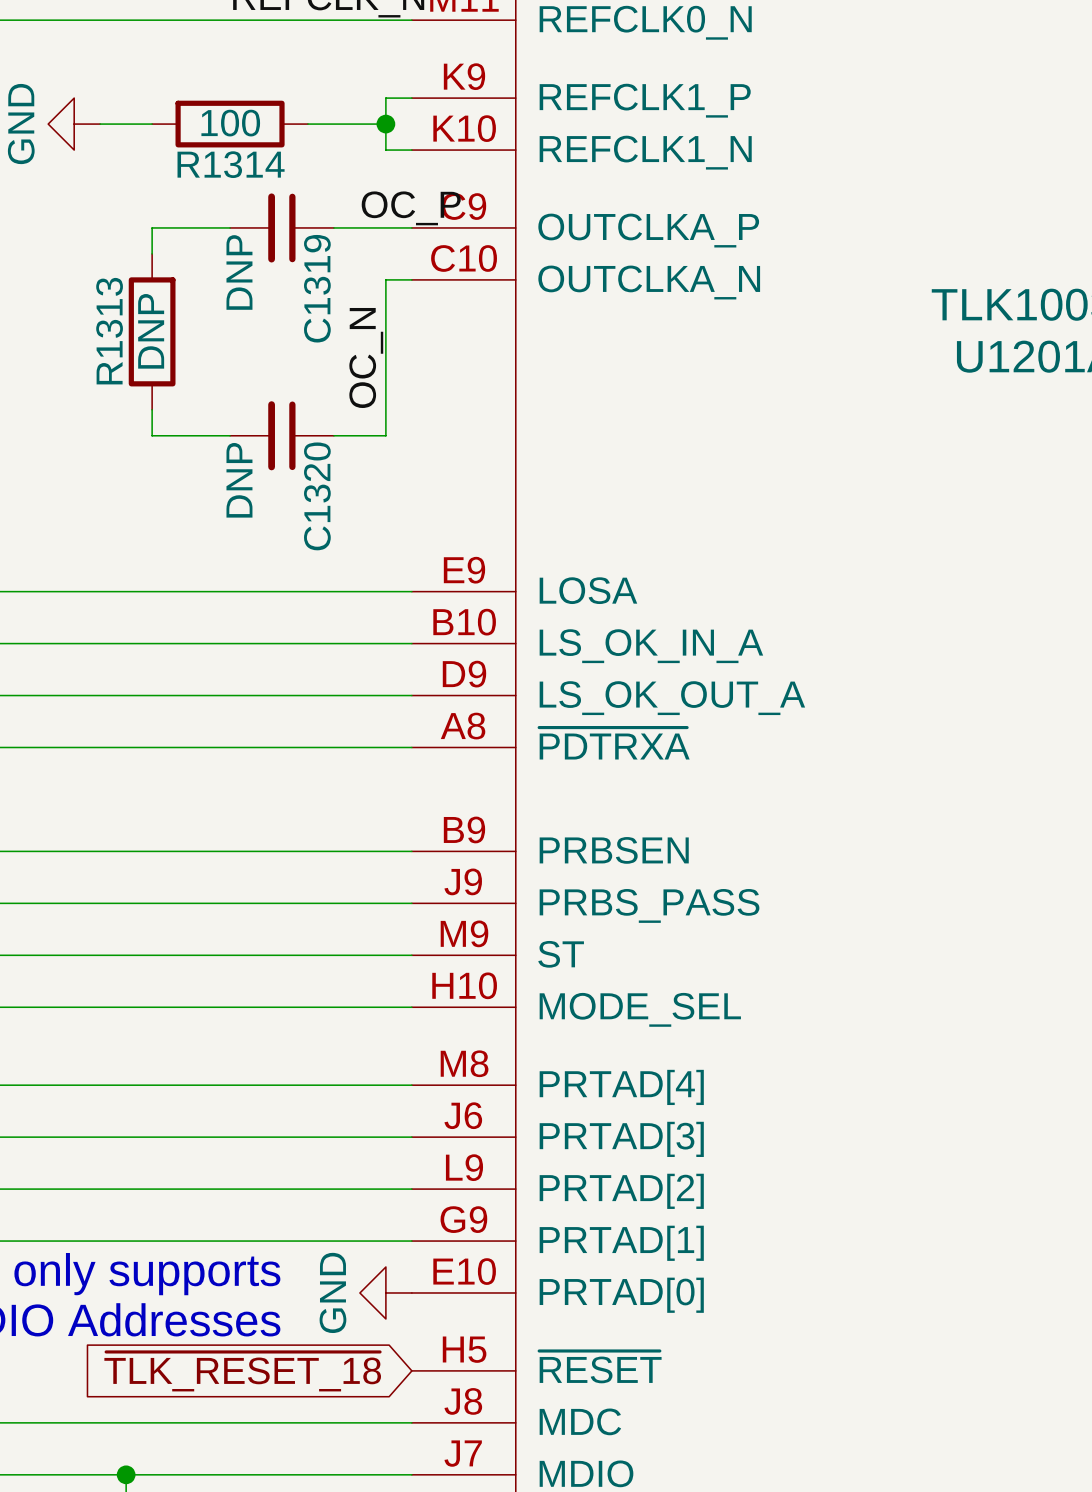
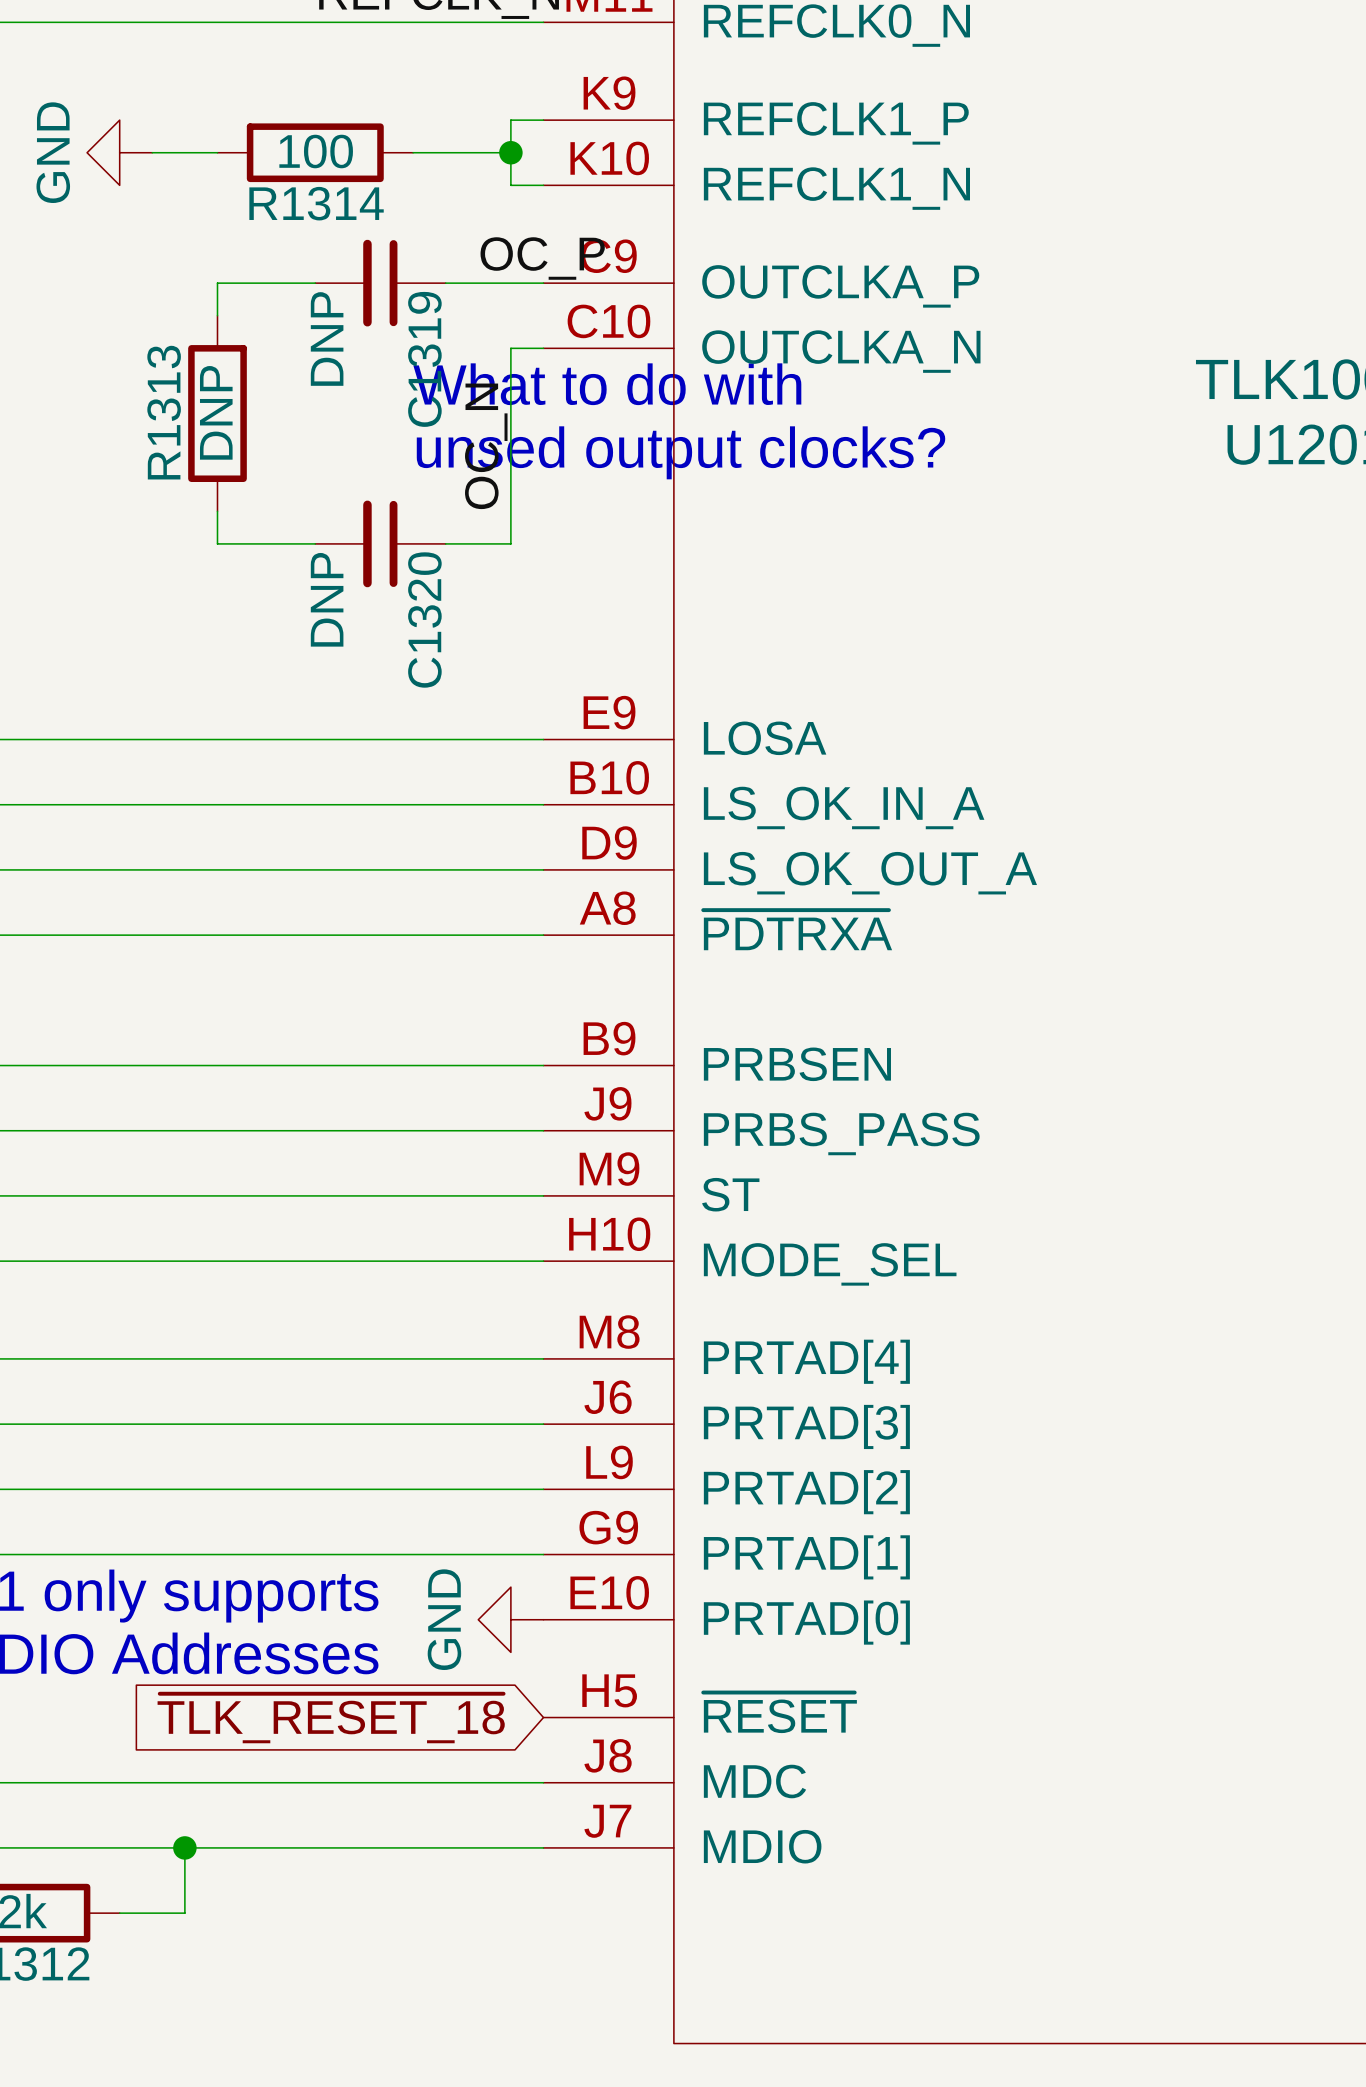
text: none -> What to do with (607, 384)
text: none -> unsed output clocks? (681, 452)

